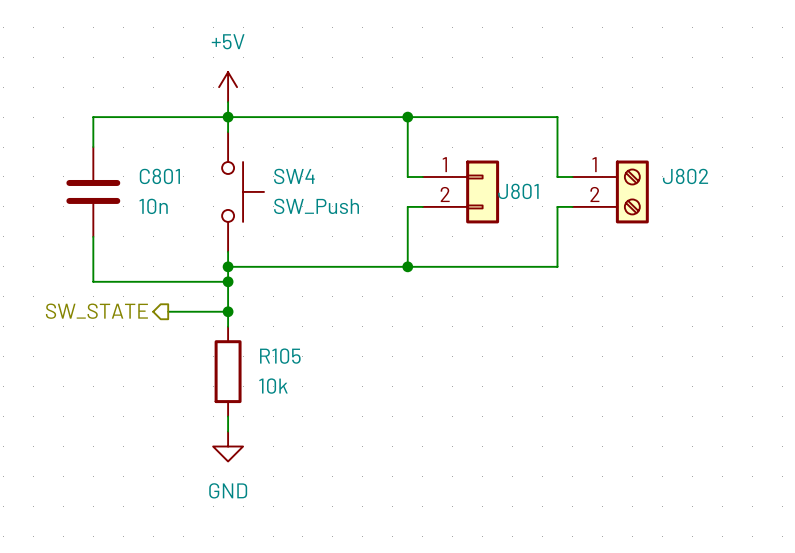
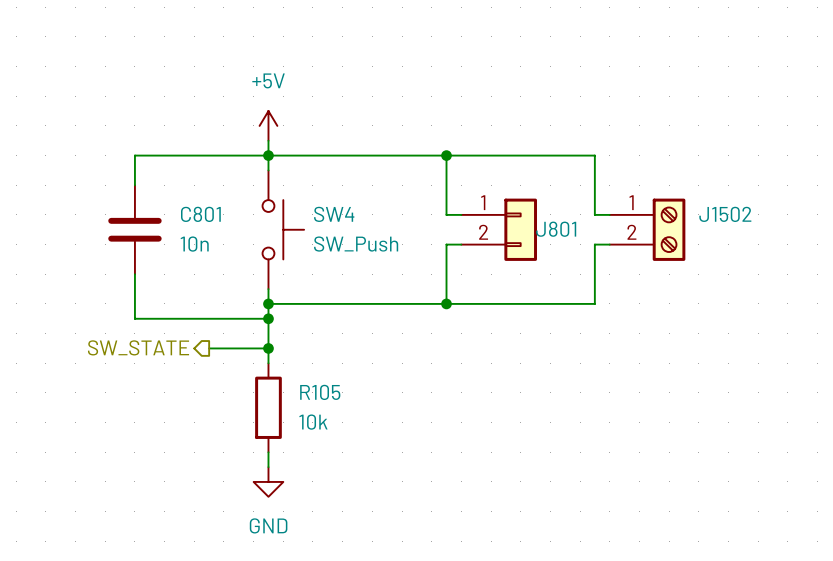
J802 name: J802 (685, 176) -> J1502 (725, 214)

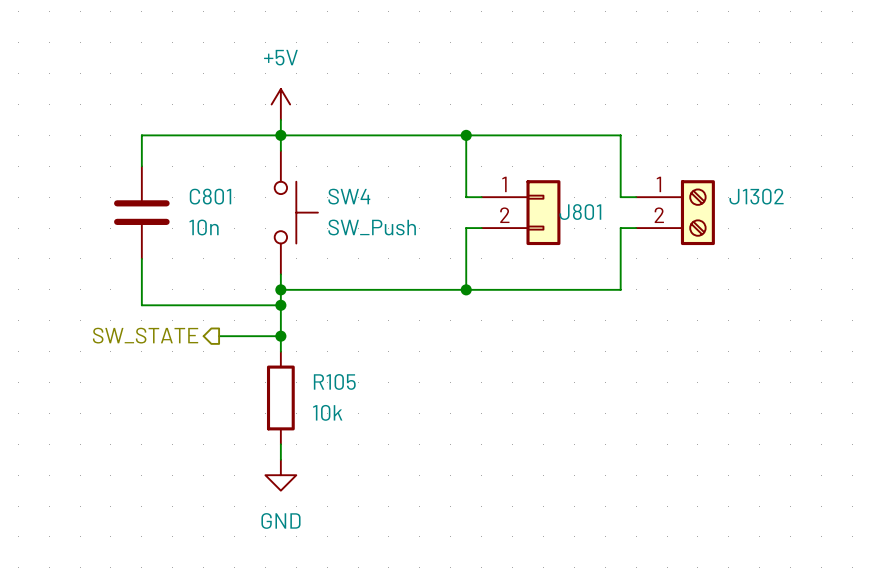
J1502 name: J1502 (725, 214) -> J1302 (756, 196)

